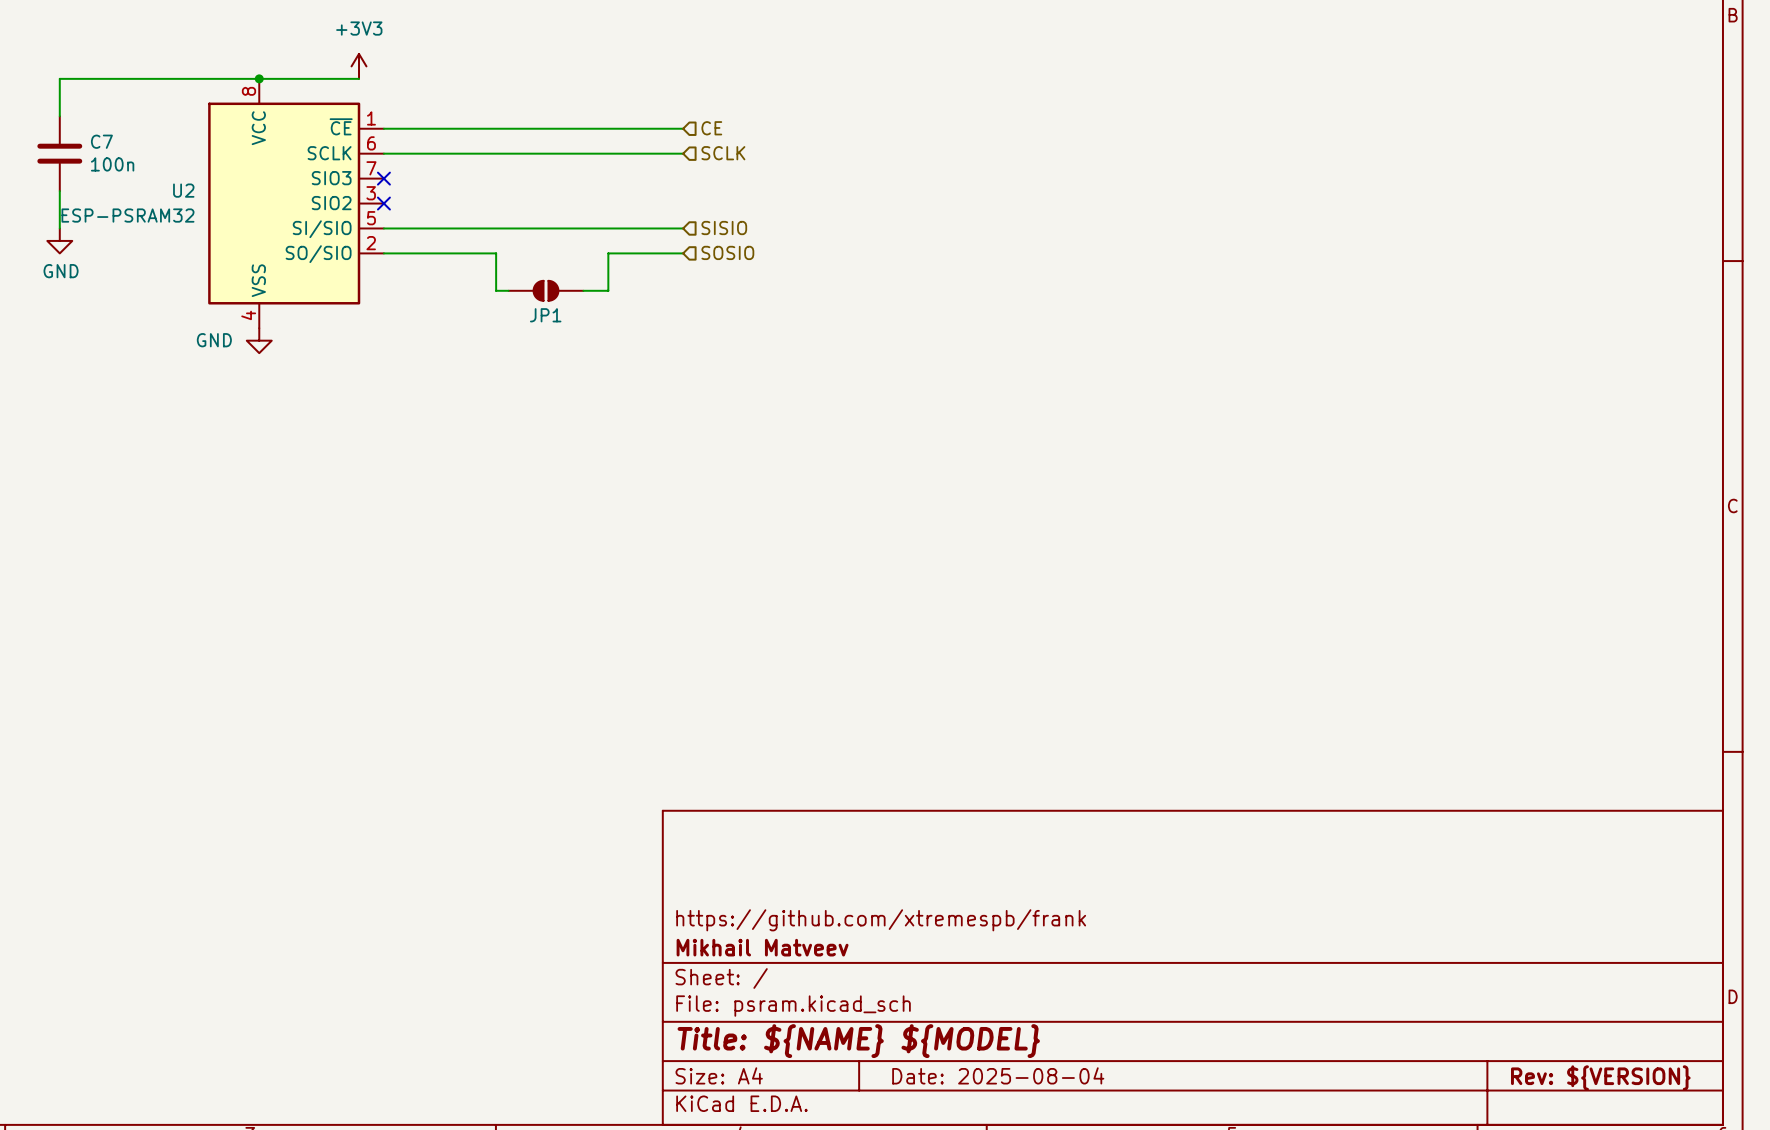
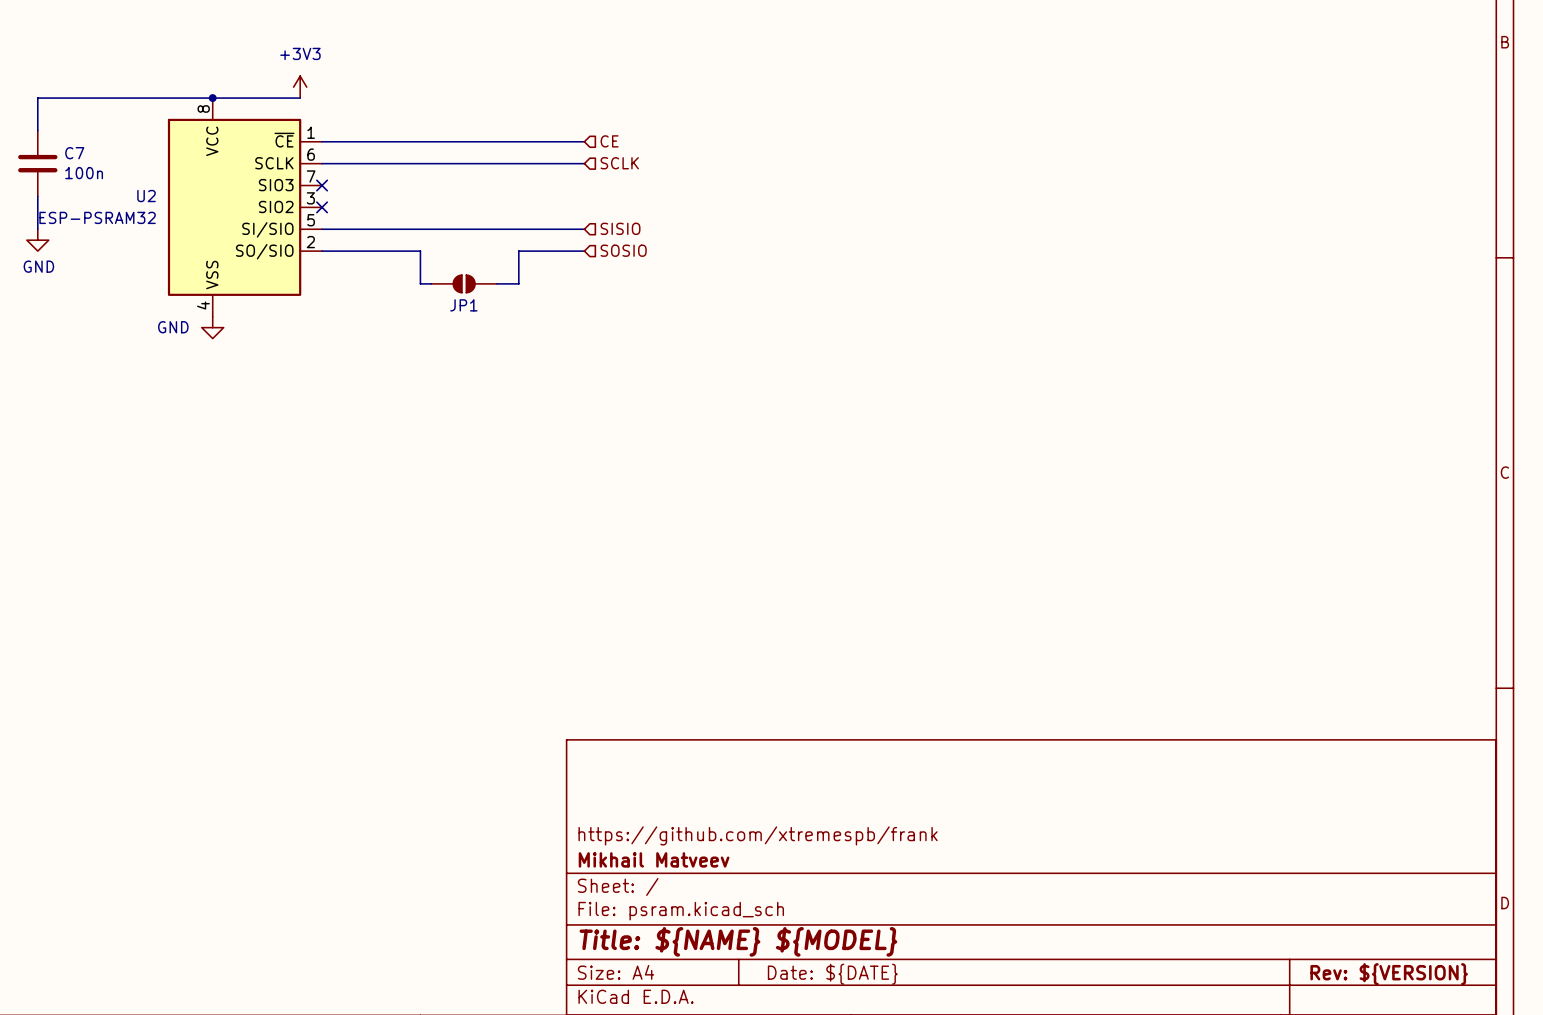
title block: Date: 2025-08-04 (998, 1075) -> Date: ${DATE} (832, 974)

